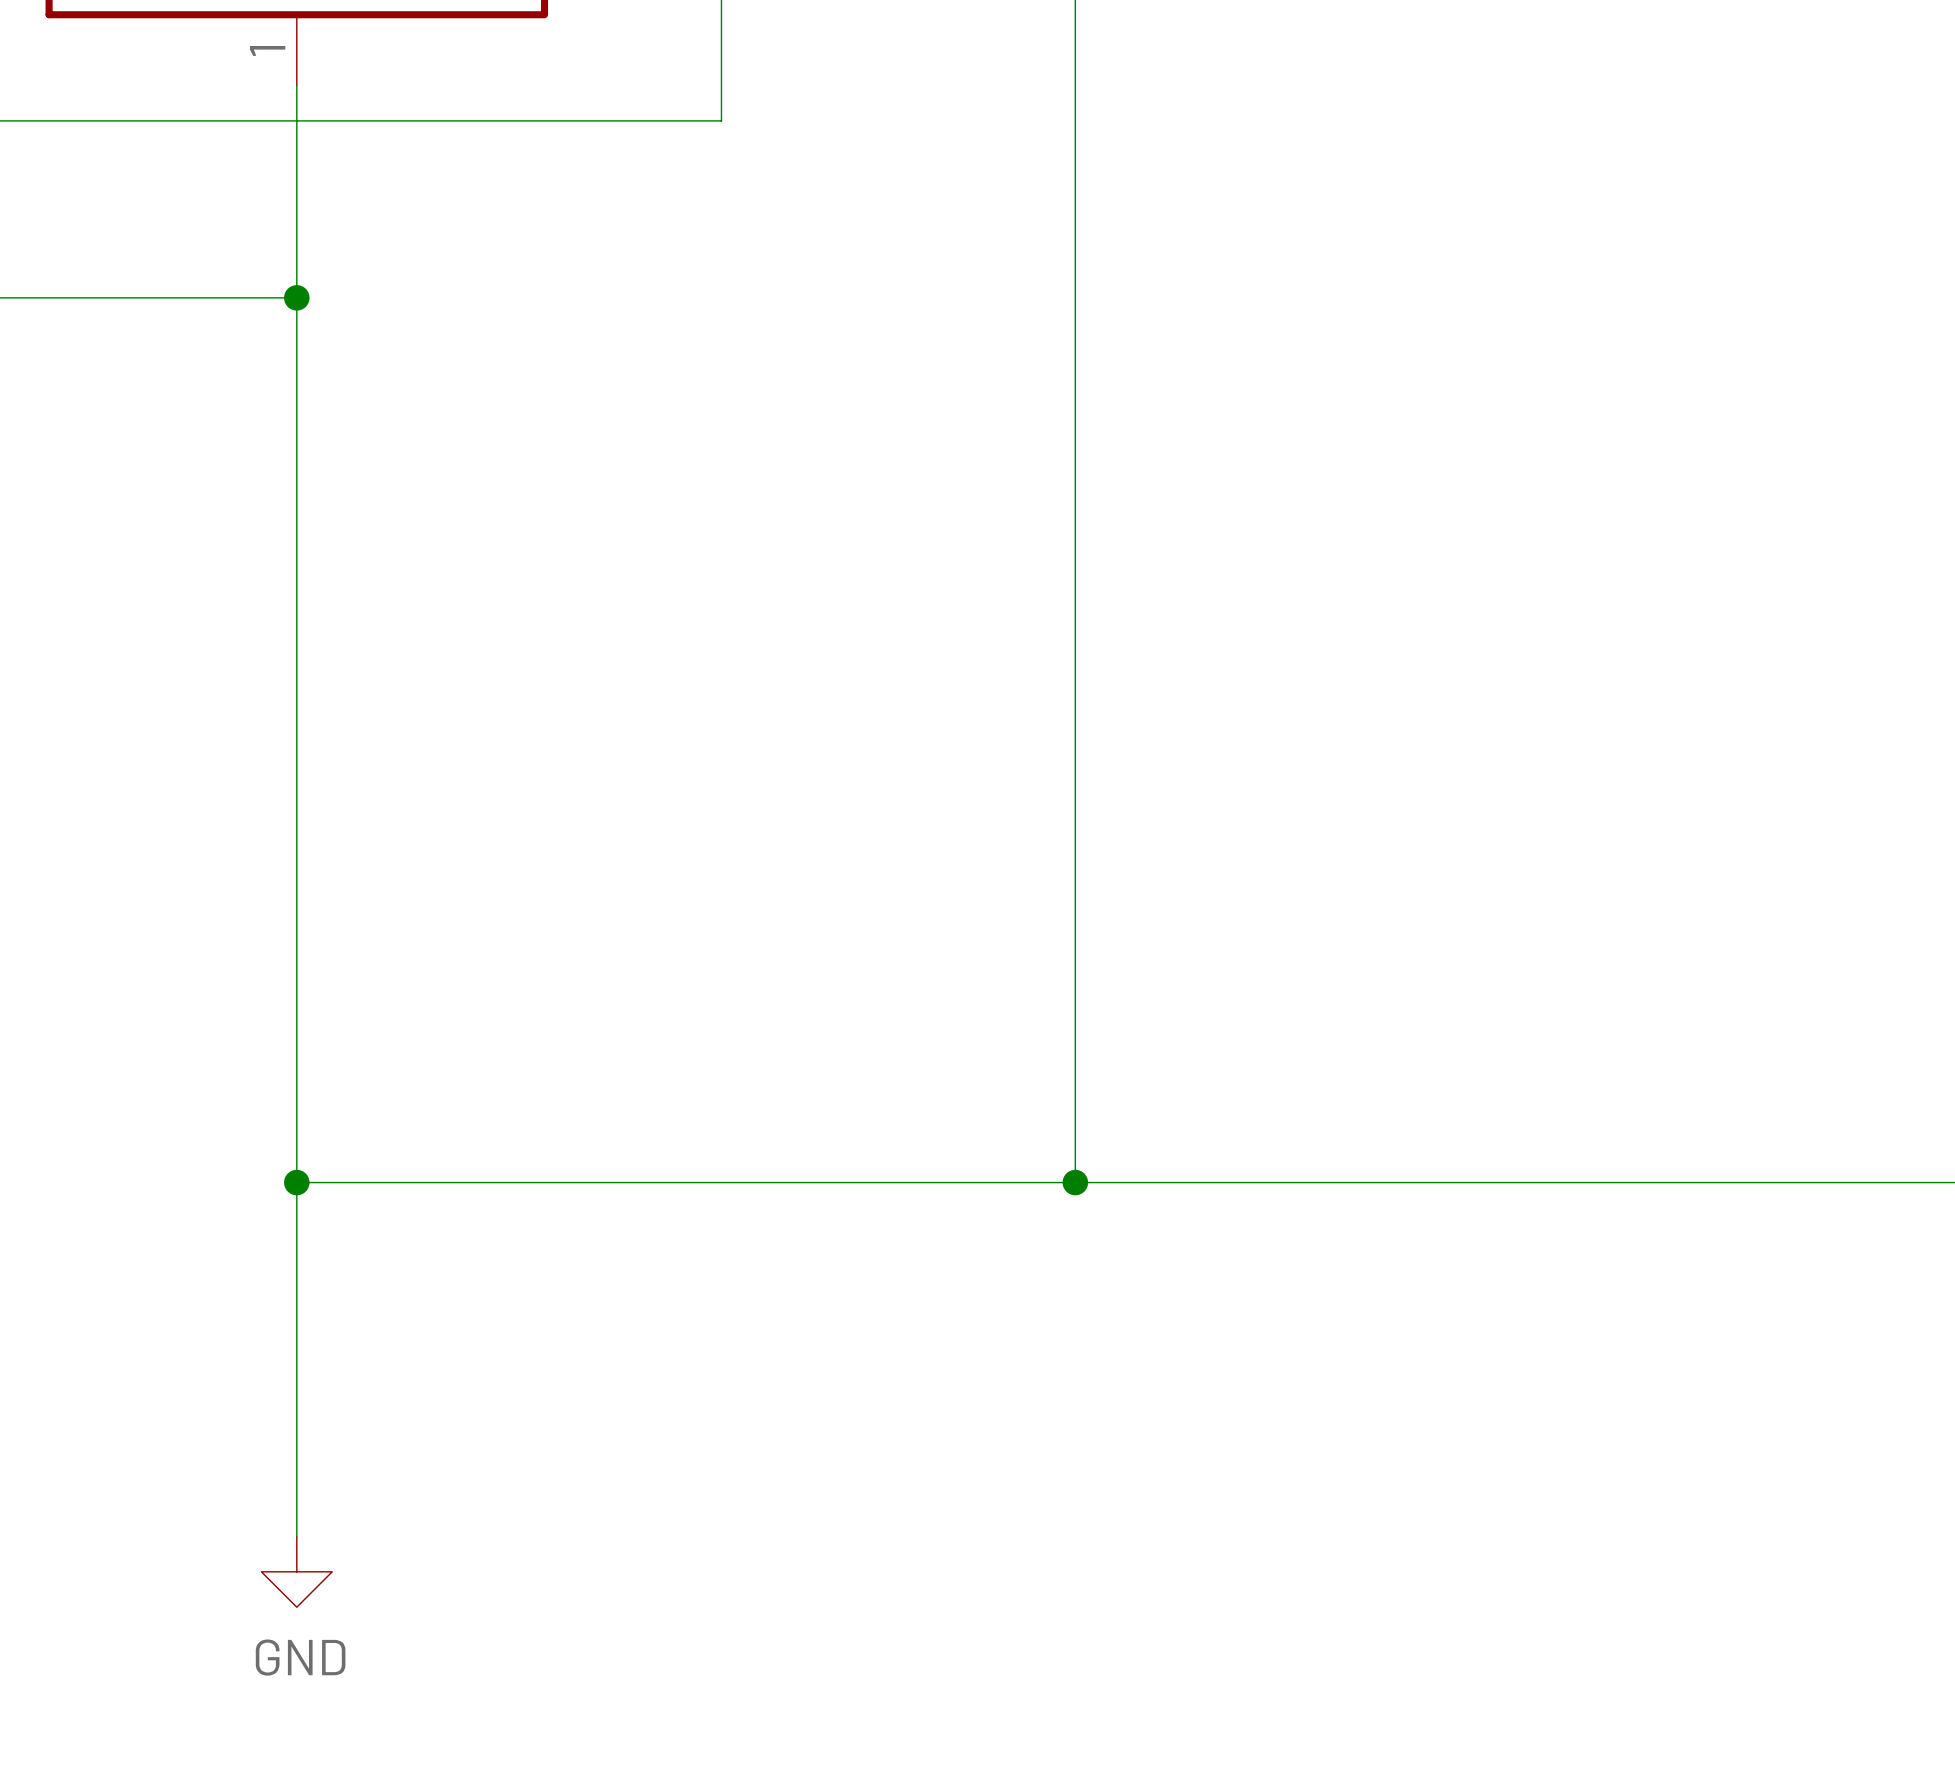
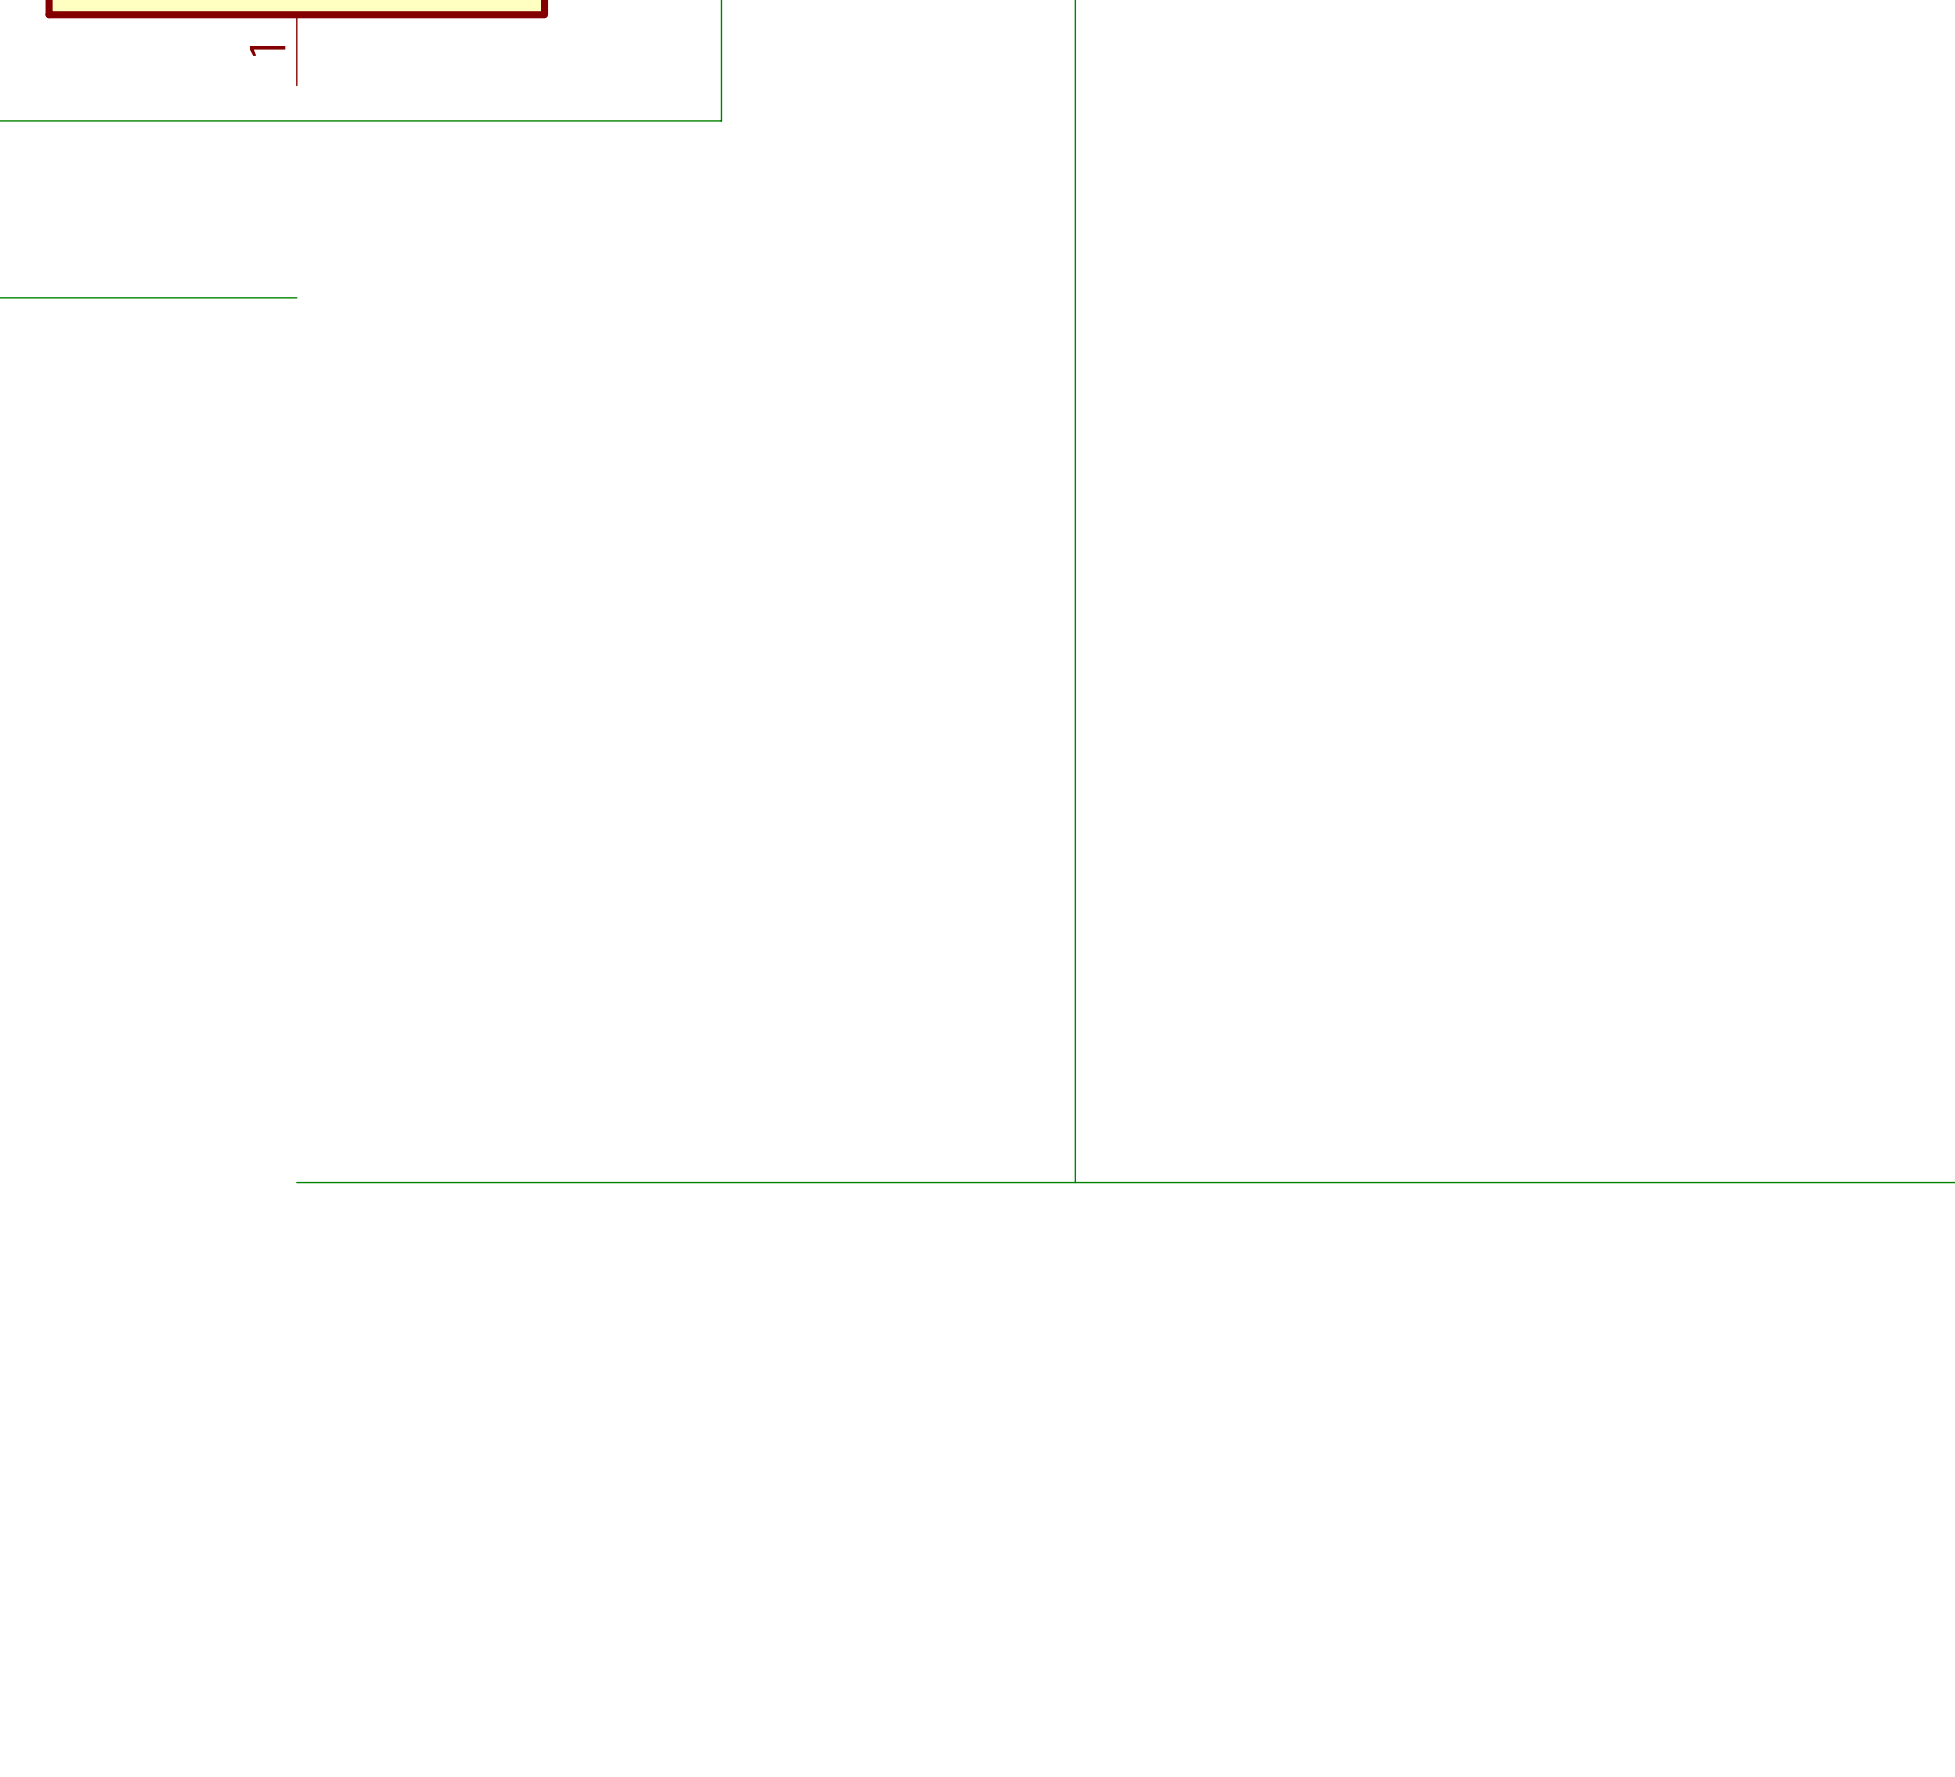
wire: (296, 85) (296, 1536) -> none
junction: (296, 297) -> none
junction: (296, 1182) -> none
junction: (1075, 1182) -> none
power symbol: GND (296, 1571) -> none

